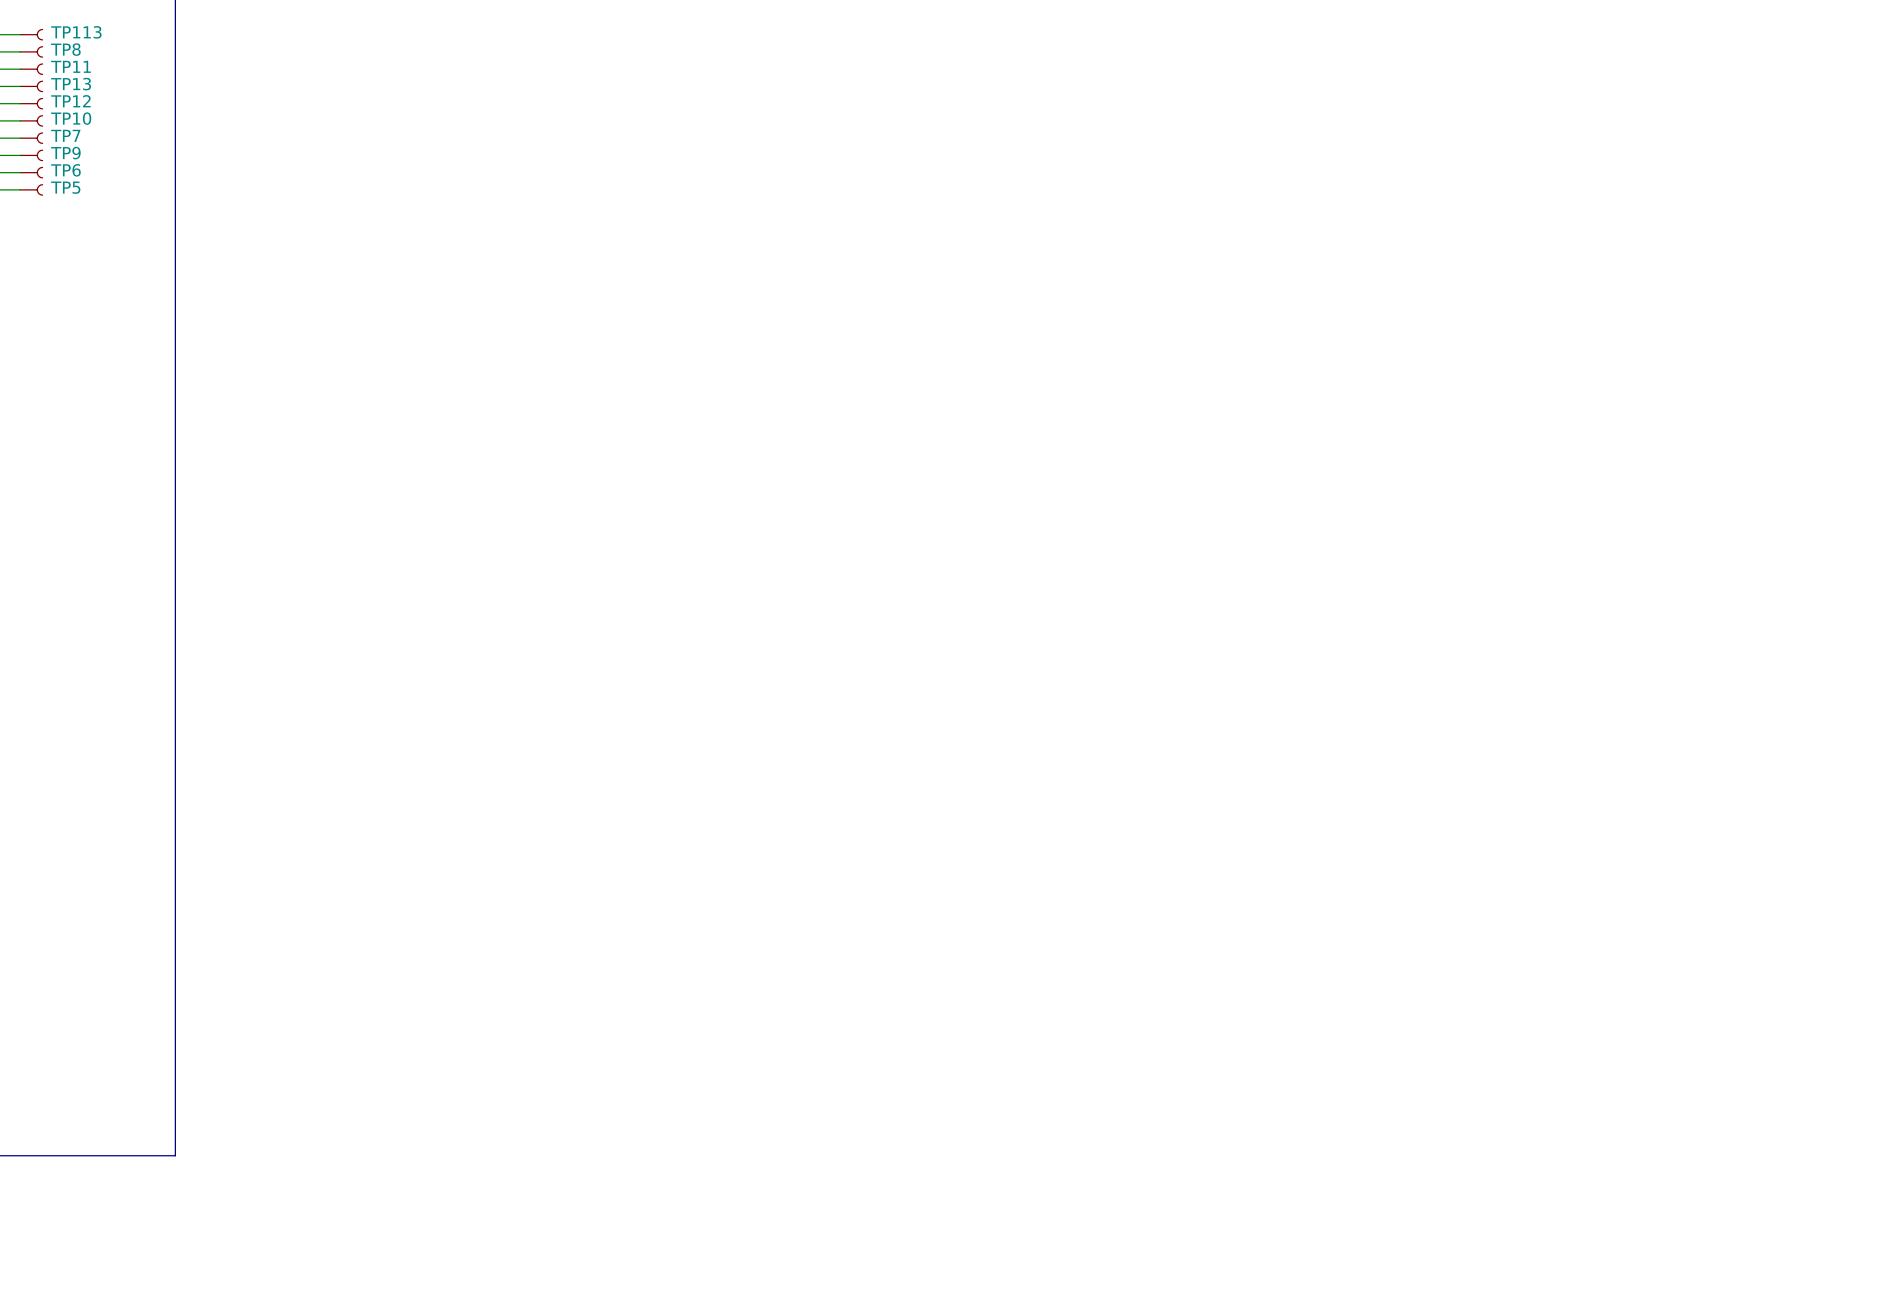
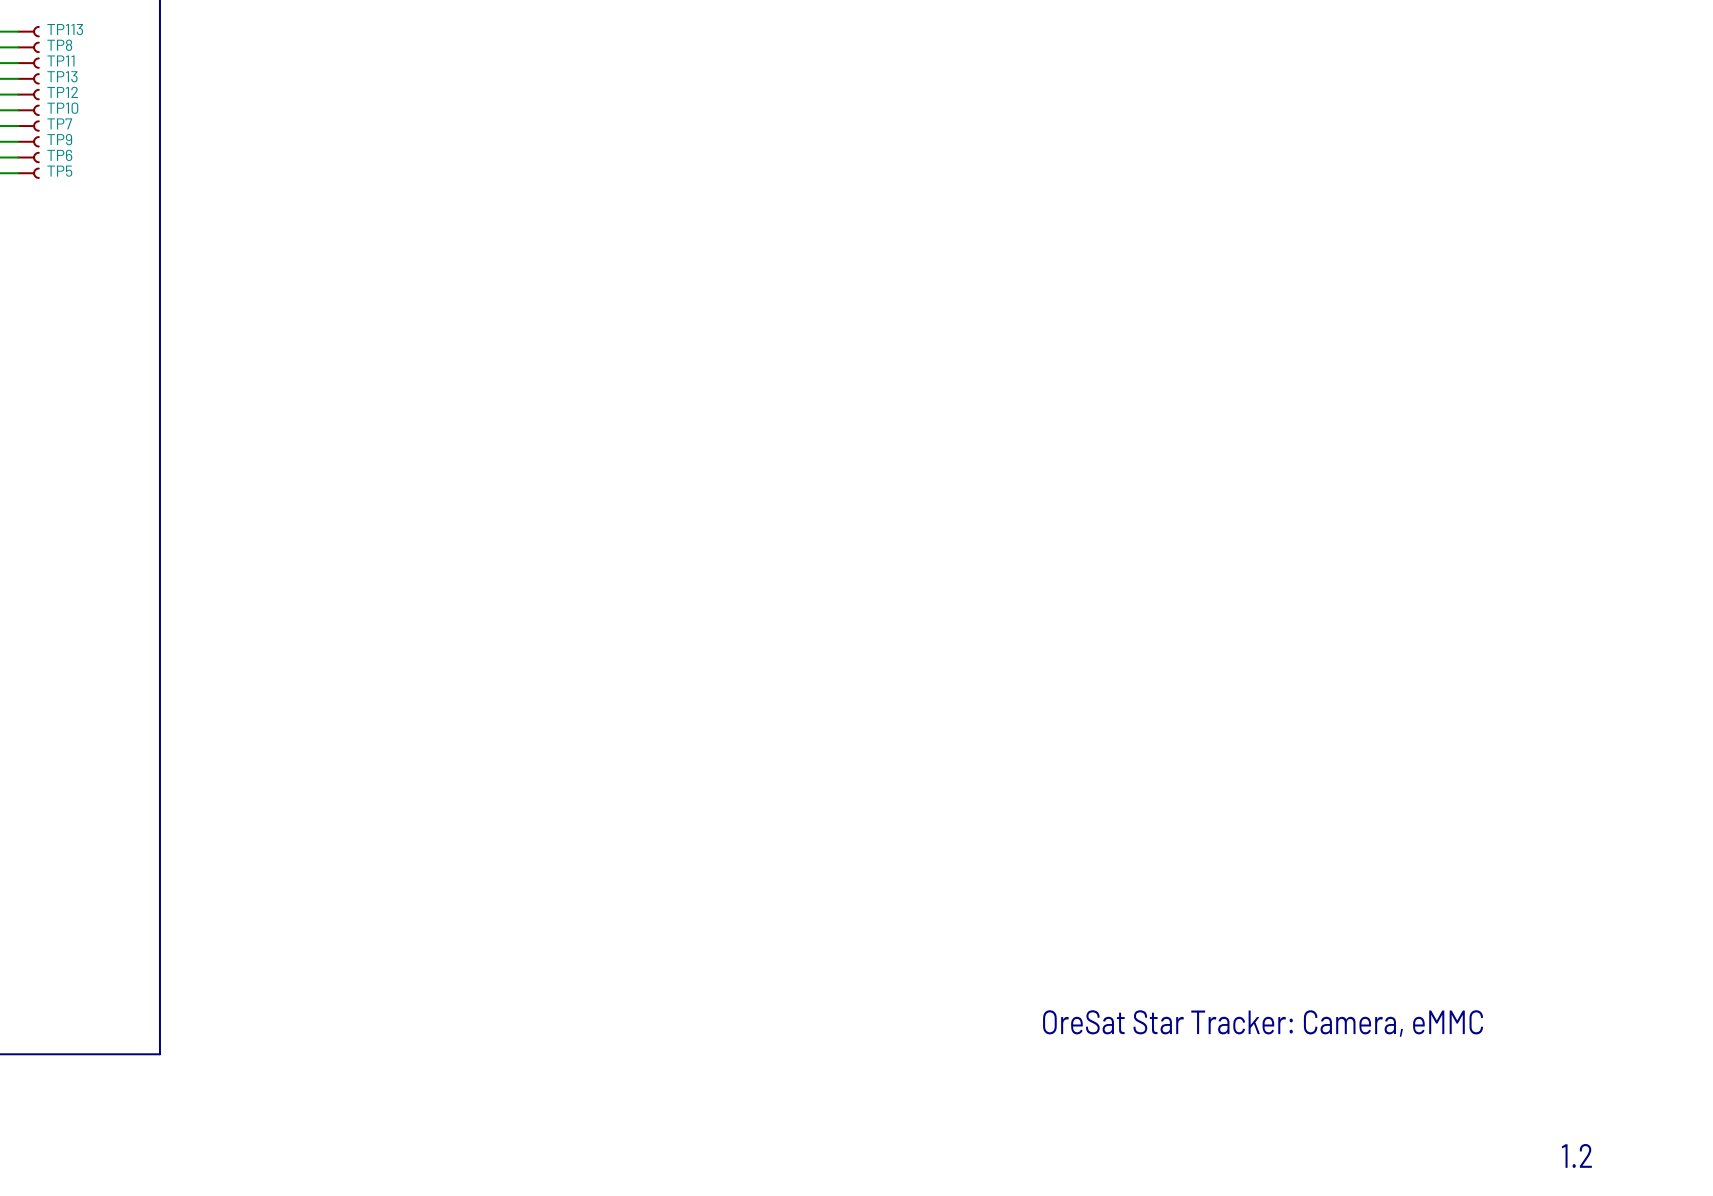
text: none -> OreSat Star Tracker: Camera, eMMC (1263, 1023)
text: none -> 1.2 (1576, 1155)

